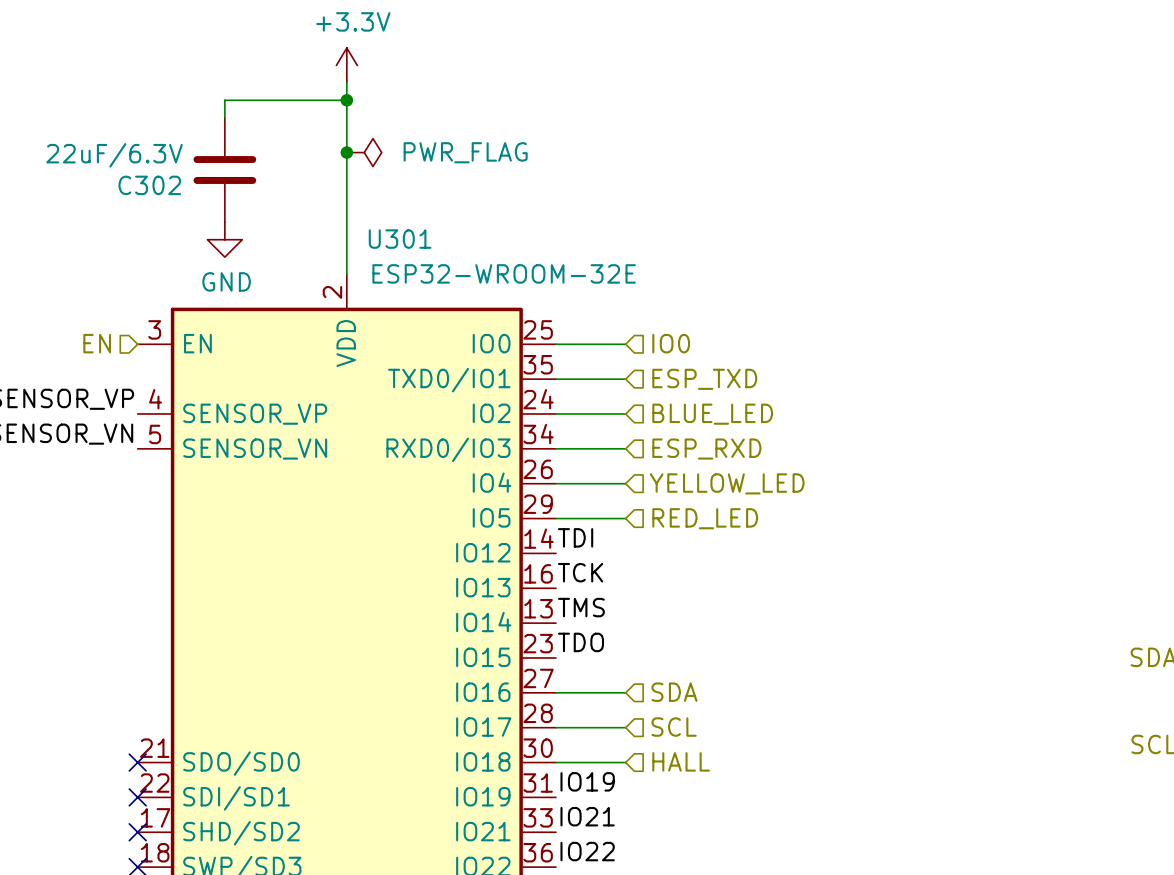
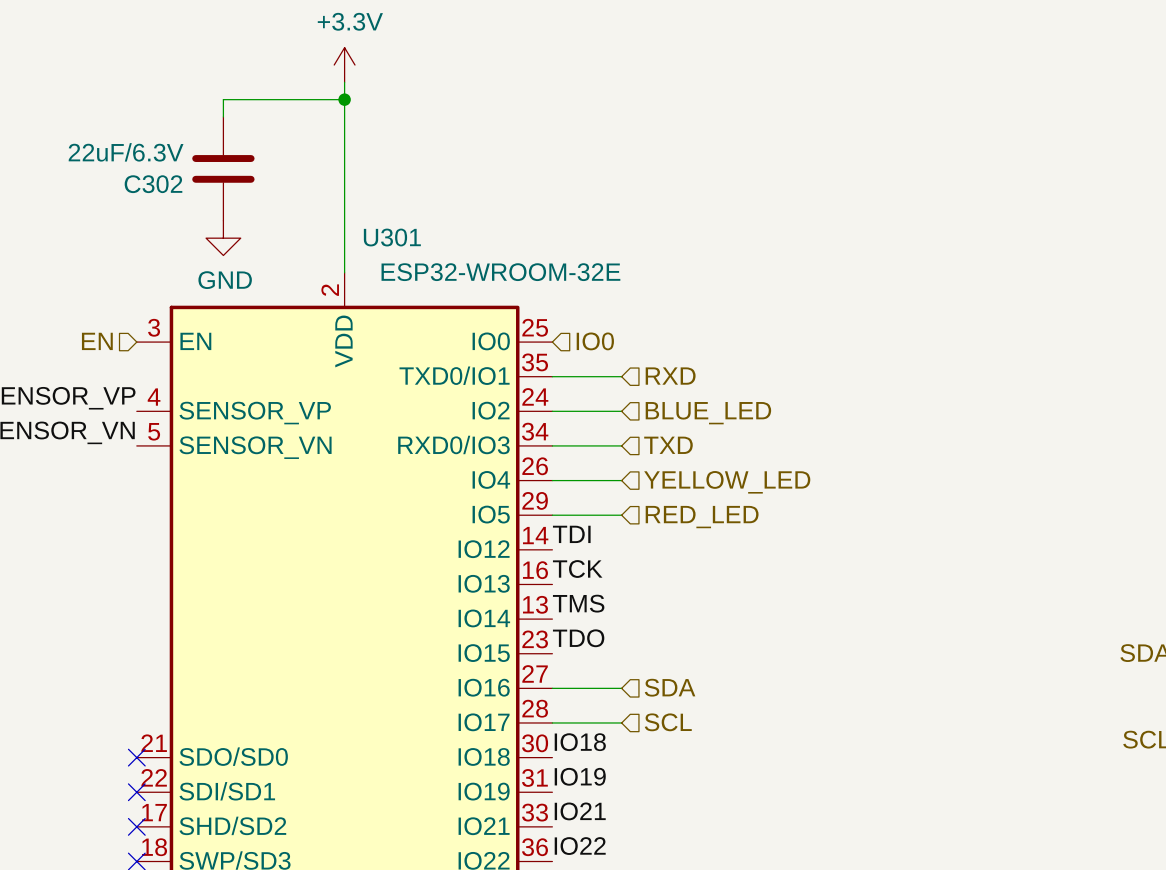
junction: (346, 152) -> none
power symbol: PWR_FLAG (364, 152) -> none
hierarchical label position: IO0 (671, 343) -> IO0 (595, 341)
wire: (555, 344) (625, 344) -> none
hierarchical label: ESP_TXD (704, 379) -> RXD (670, 376)
hierarchical label: ESP_RXD (706, 449) -> TXD (668, 445)
label: none -> IO18 (580, 742)
hierarchical label: HALL (681, 761) -> none
wire: (555, 762) (625, 762) -> none

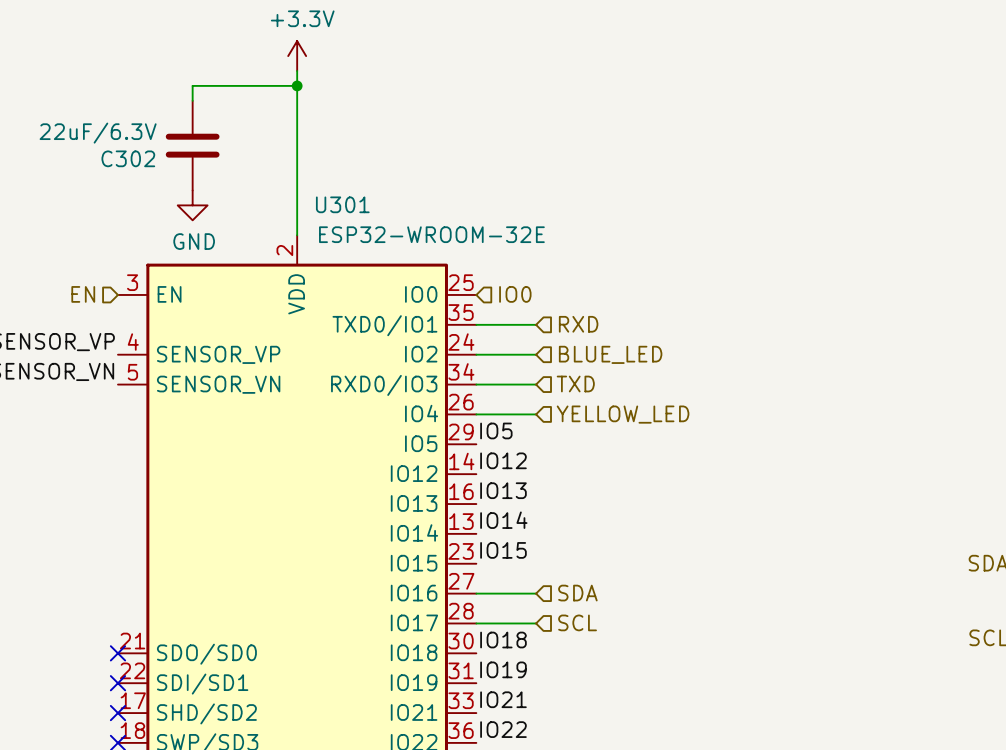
label: none -> IO5 (496, 430)
wire: (552, 515) (621, 515) -> none
hierarchical label: RED_LED (702, 517) -> none
label: TDI (571, 534) -> IO12 (503, 460)
label: TCK (577, 569) -> IO13 (503, 490)
label: TMS (578, 603) -> IO14 (503, 520)
label: TDO (578, 638) -> IO15 (503, 550)

